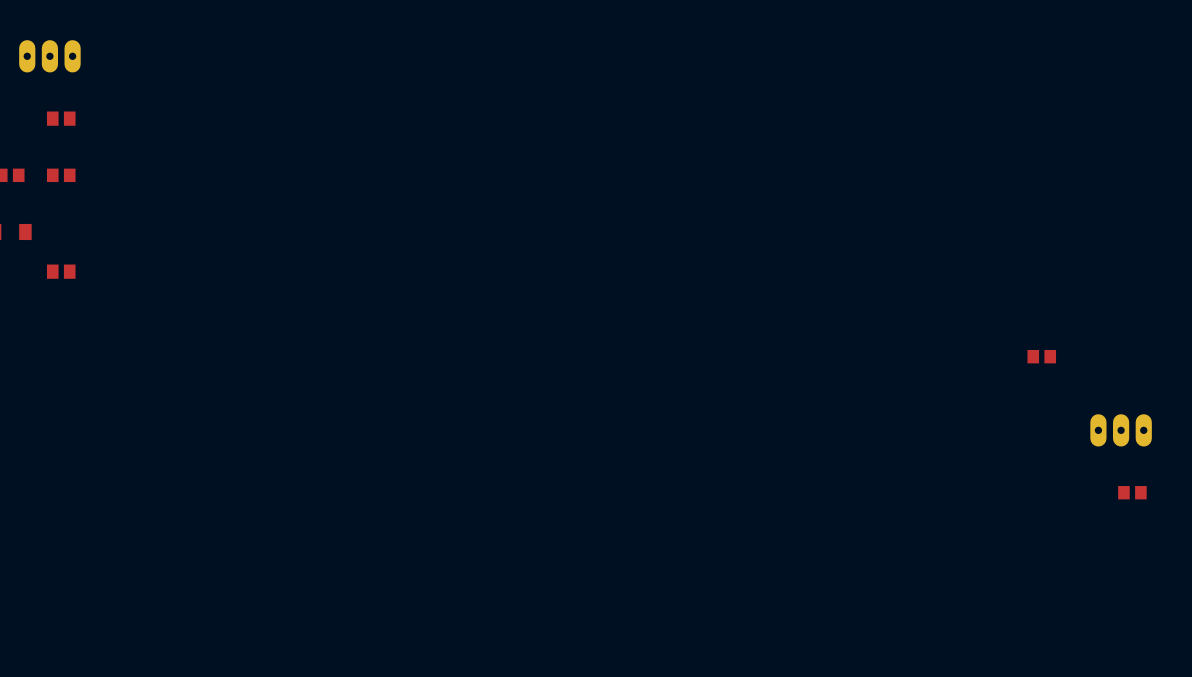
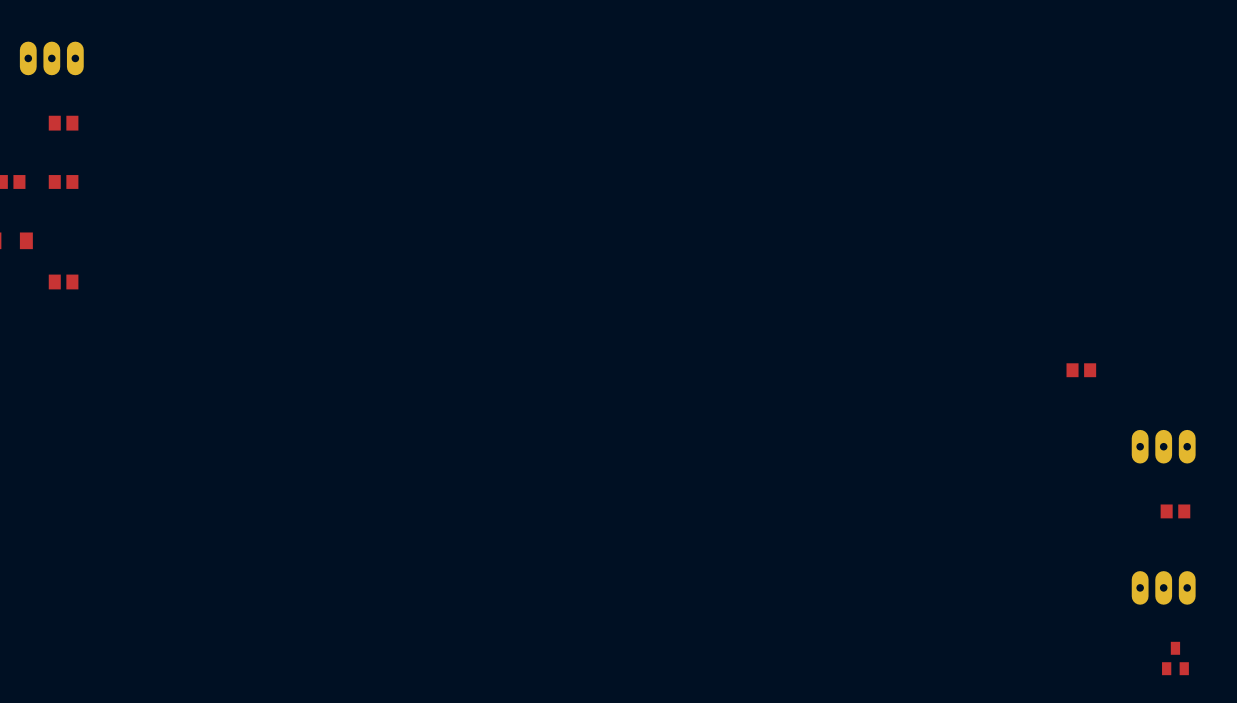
part: none -> (1163, 587)
part: none -> (1175, 658)

